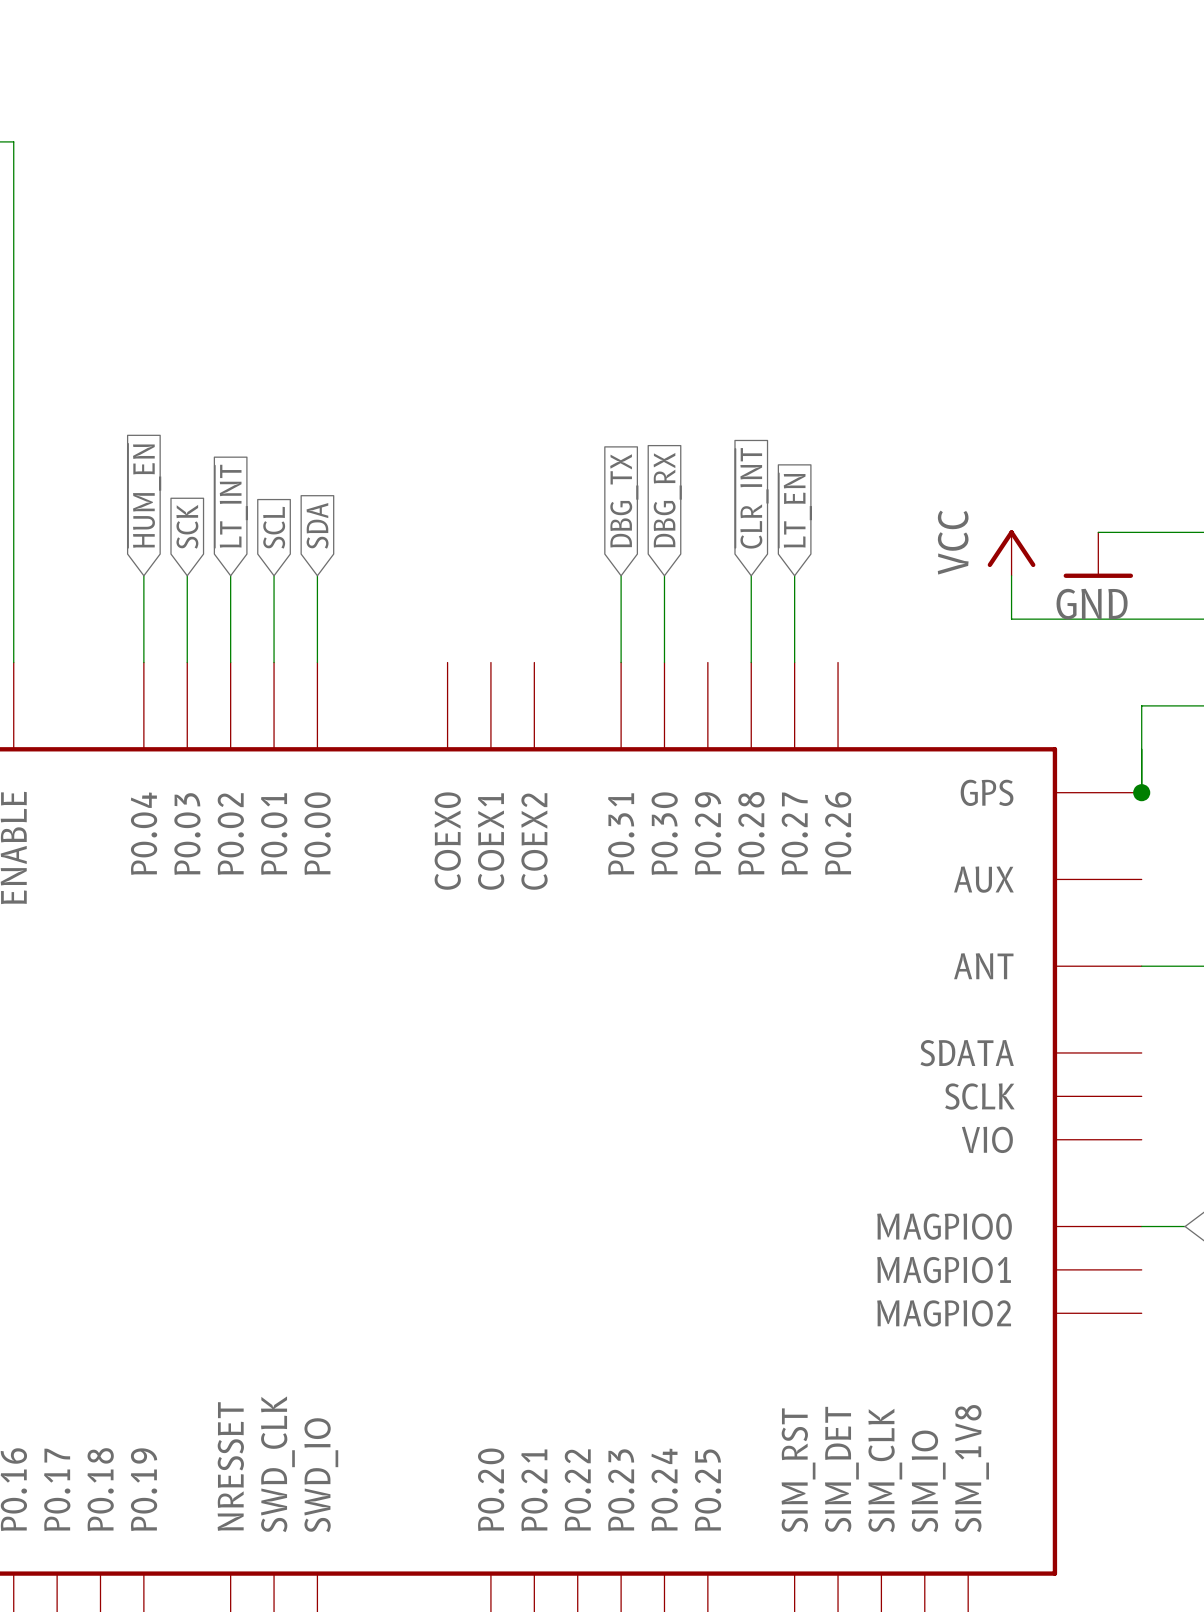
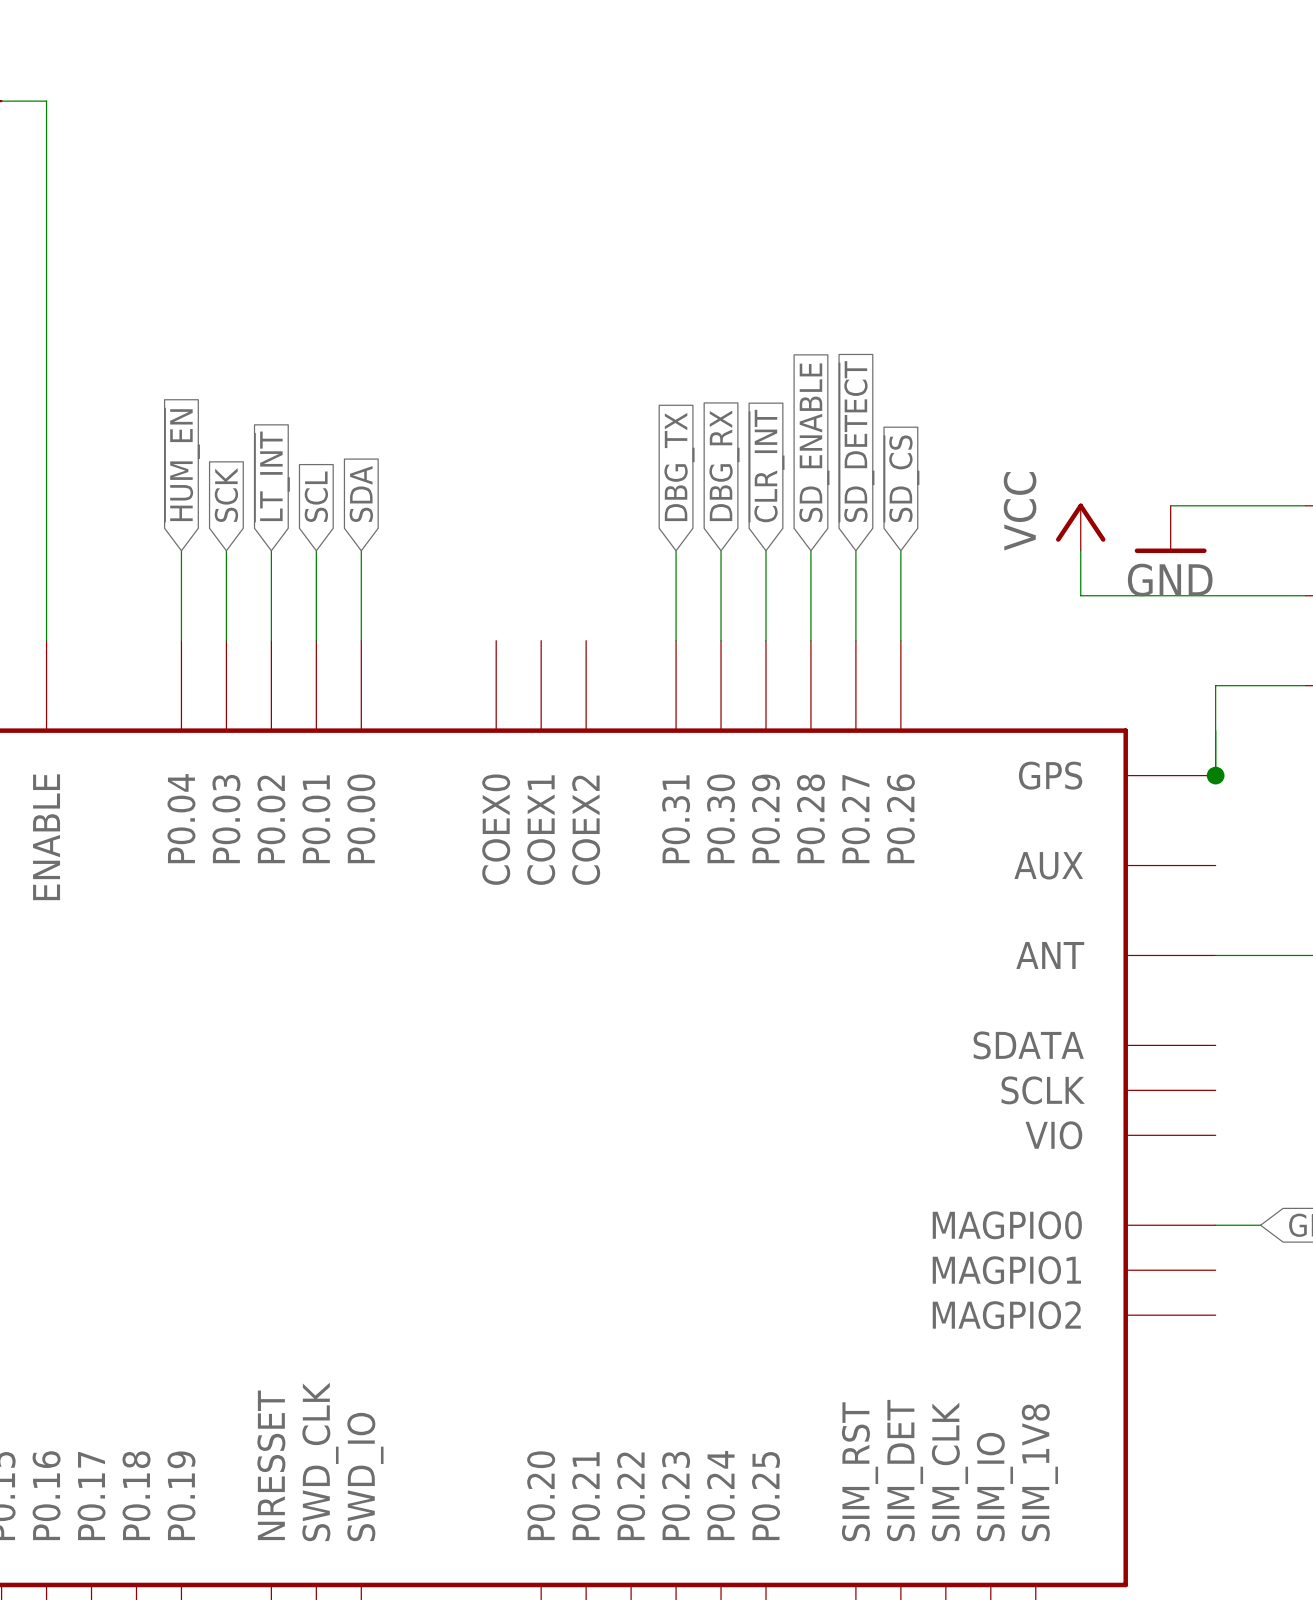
global label: none -> ~{CLR_INT} (767, 466)
global label: ~{CLR_INT} (752, 498) -> SD_ENABLE (814, 442)
global label: ~{LT_EN} (795, 510) -> ~{SD_DETECT} (856, 441)
global label: none -> ~{SD_CS} (901, 478)
wire: none -> (765, 550) (765, 640)
wire: none -> (900, 550) (900, 640)

